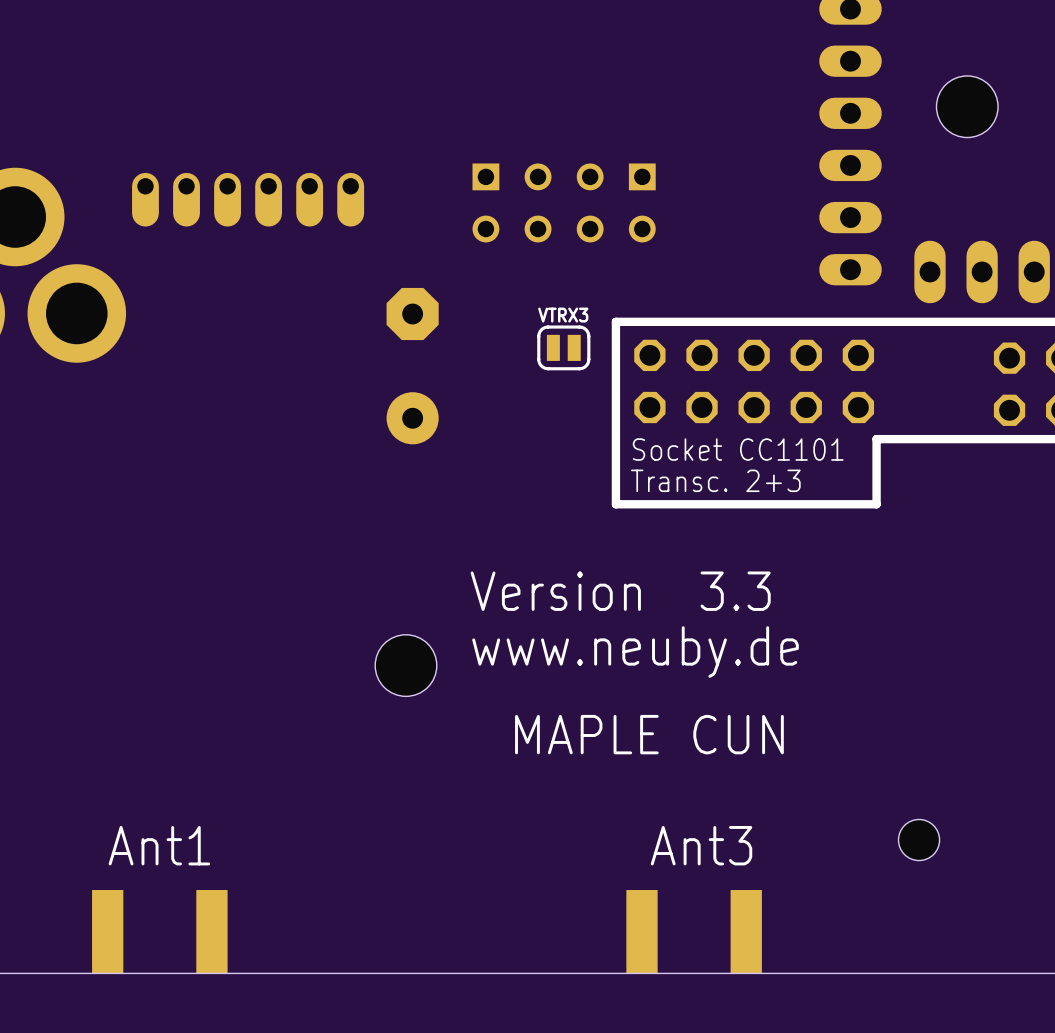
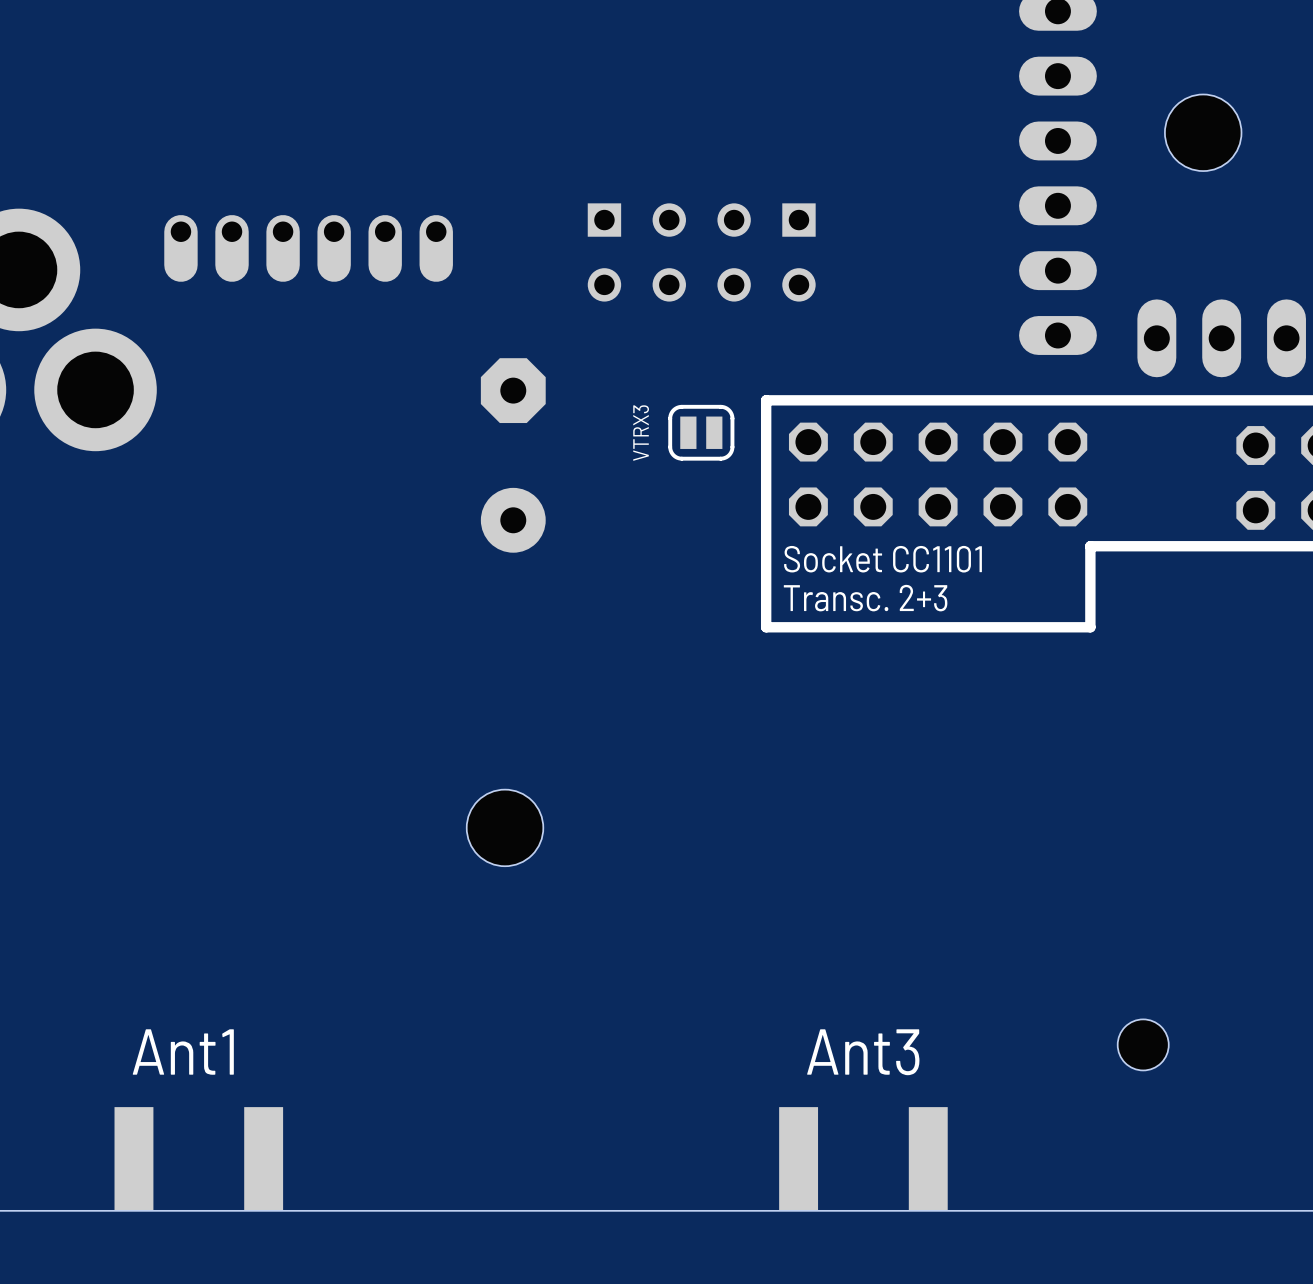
VTRX3 name rotation: 0° (563, 315) -> 90° counterclockwise (641, 433)
text: Version 3.3 (620, 591) -> none
text: www.neuby.de (635, 652) -> none
text: MAPLE CUN (649, 734) -> none

